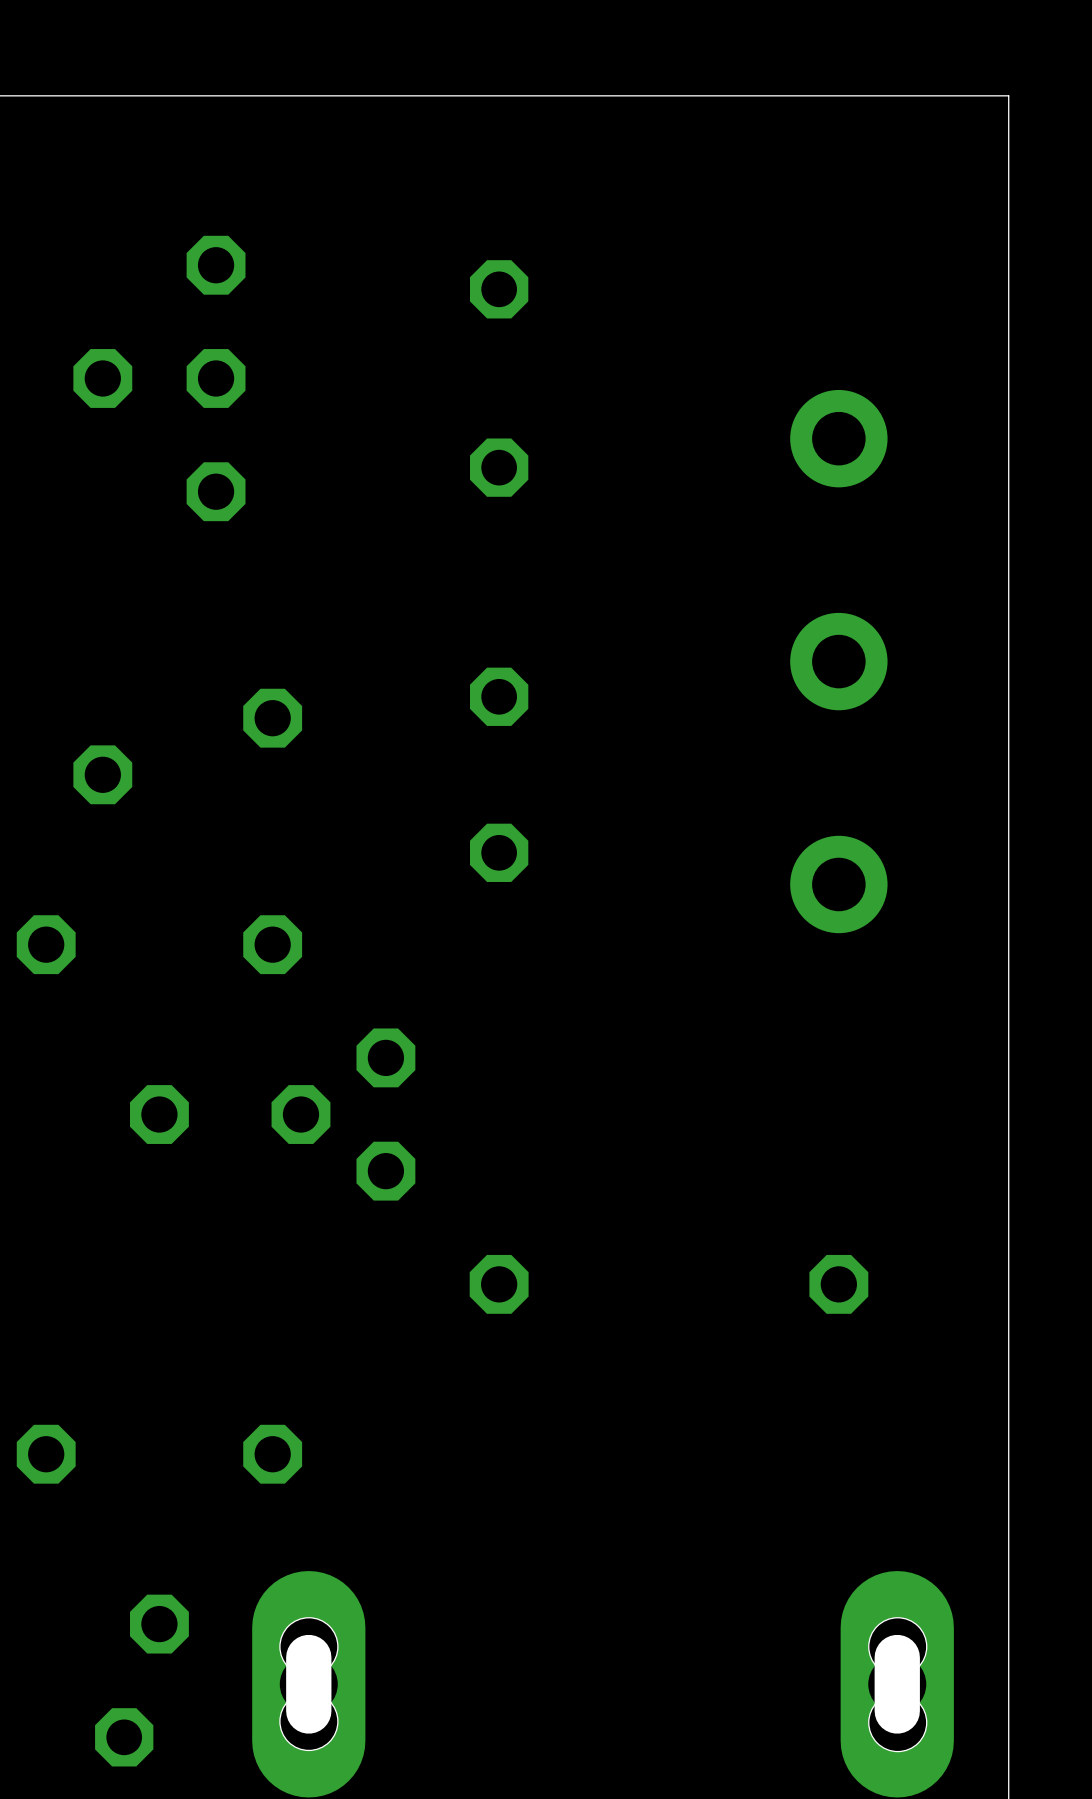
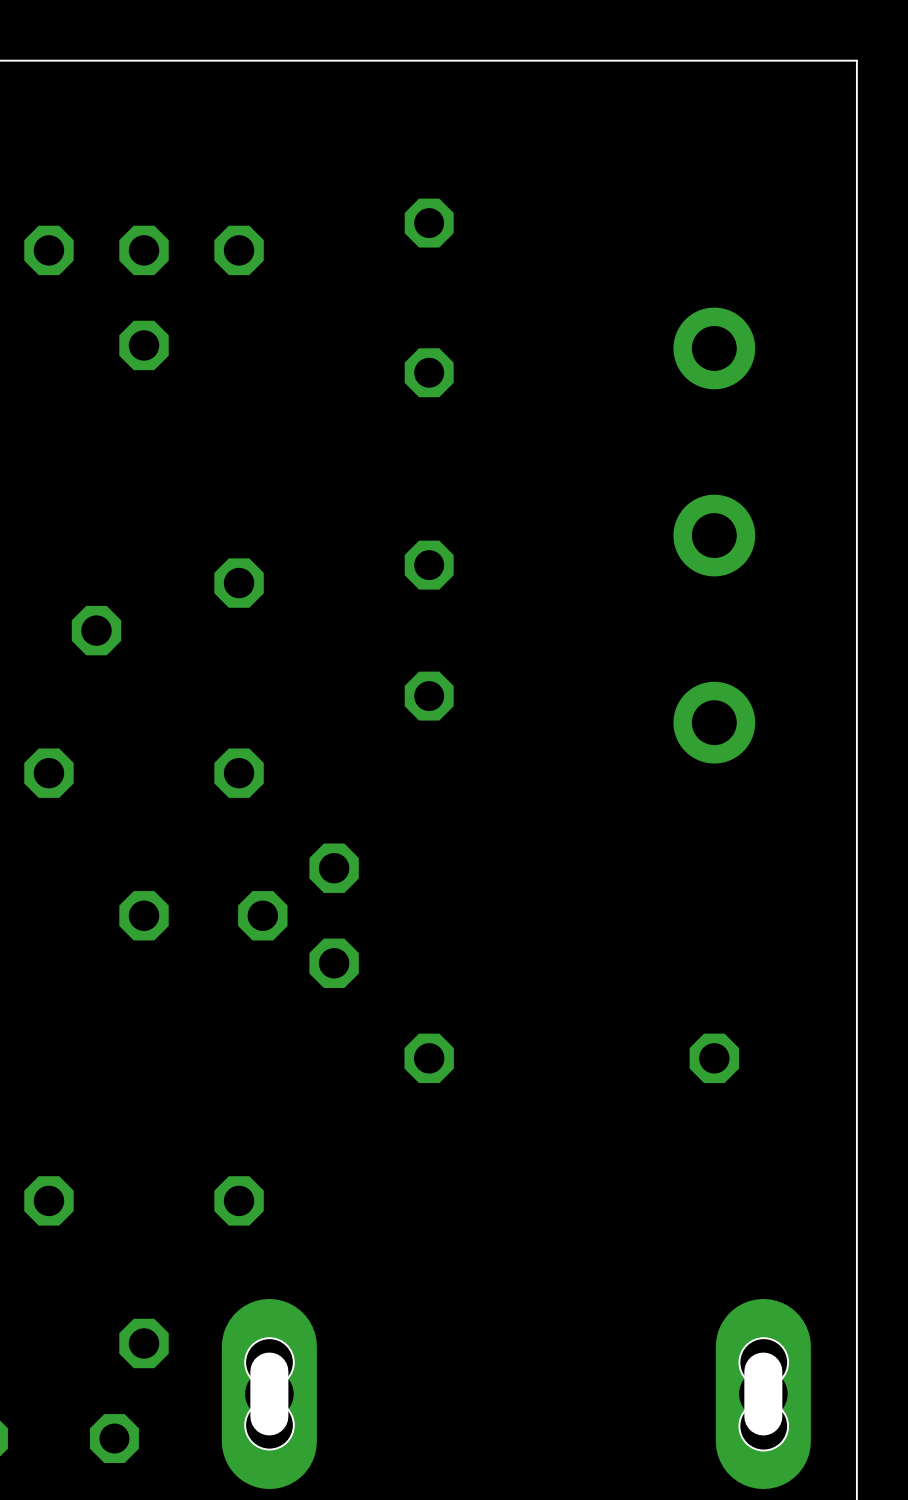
part rotation: 0° (159, 378) -> 90° counterclockwise (144, 297)

